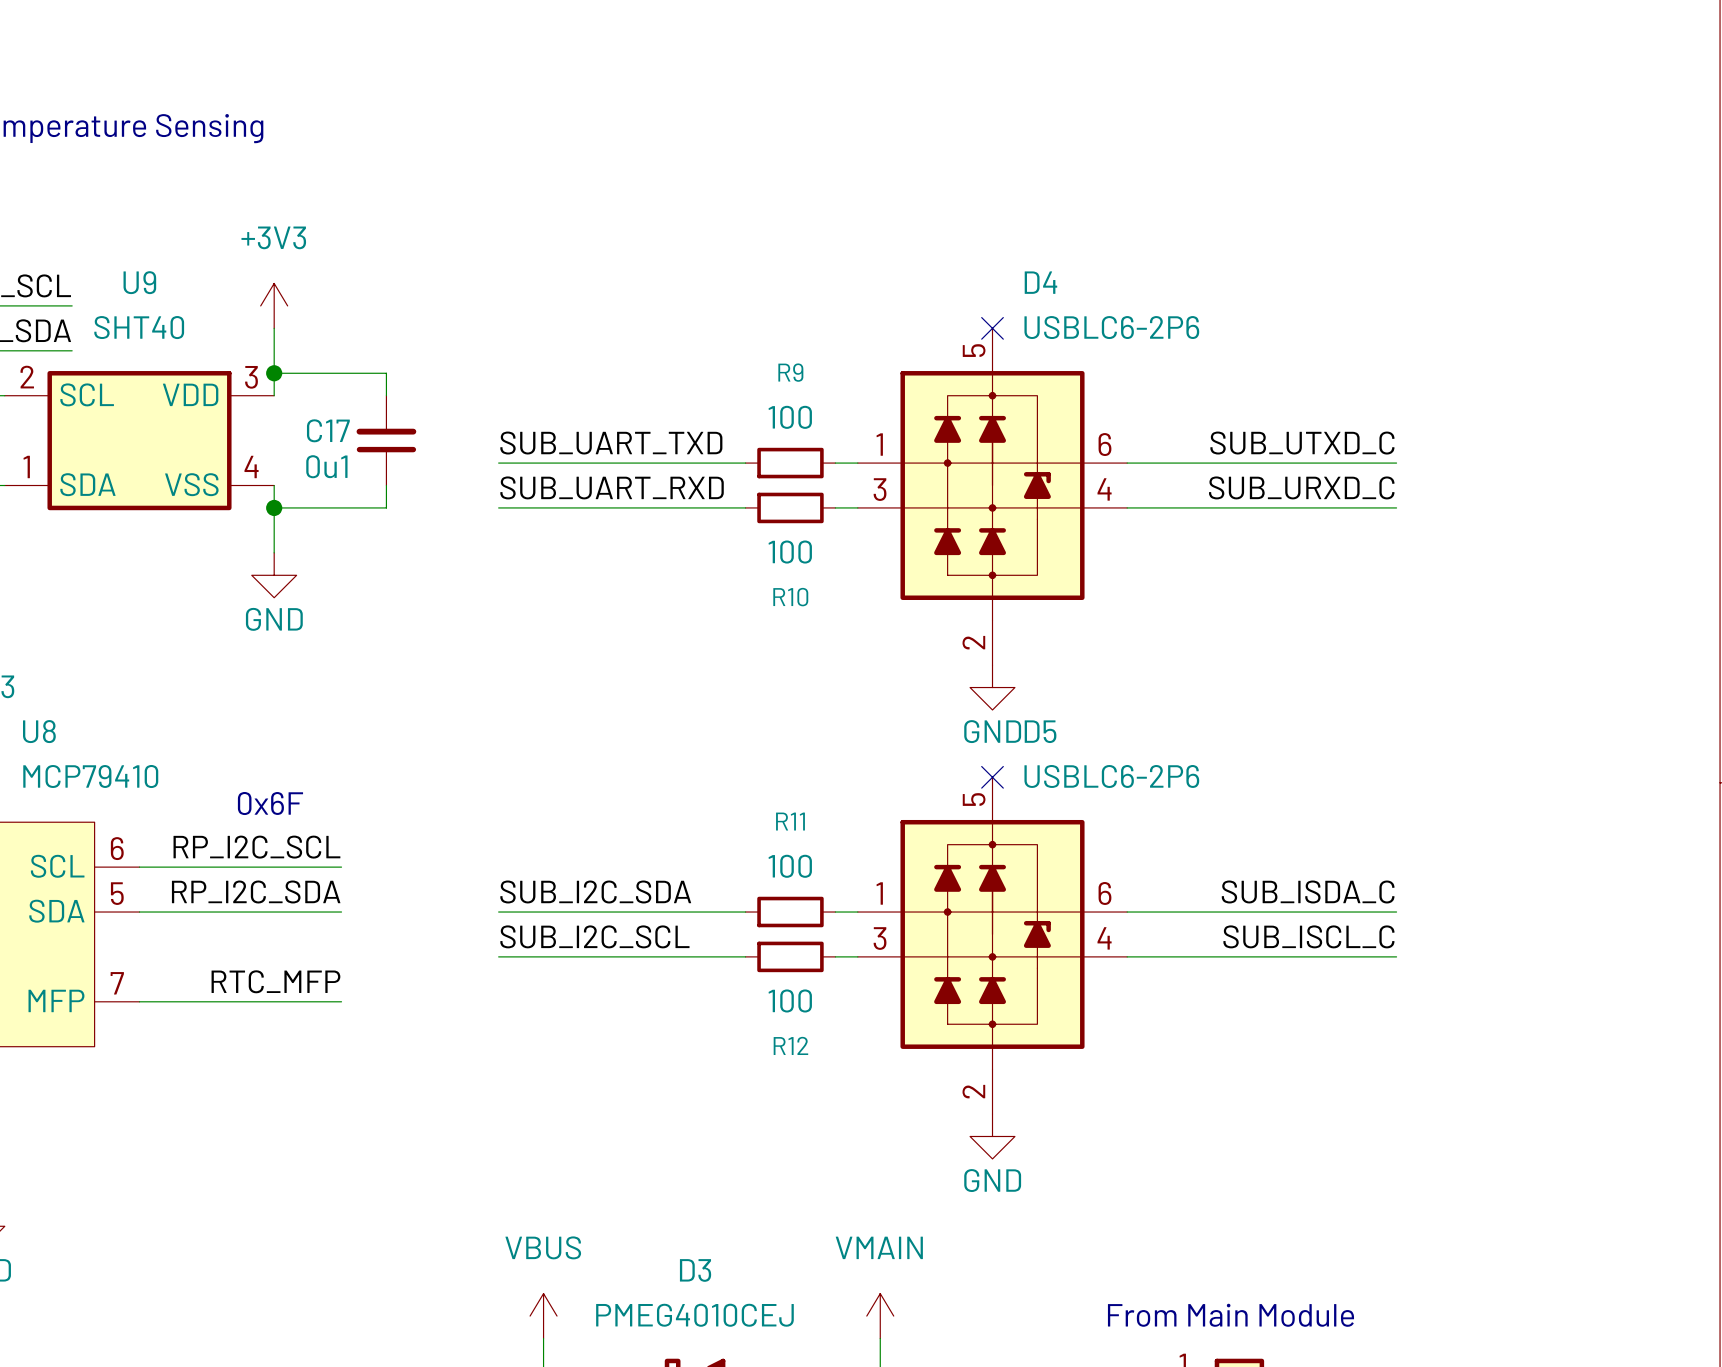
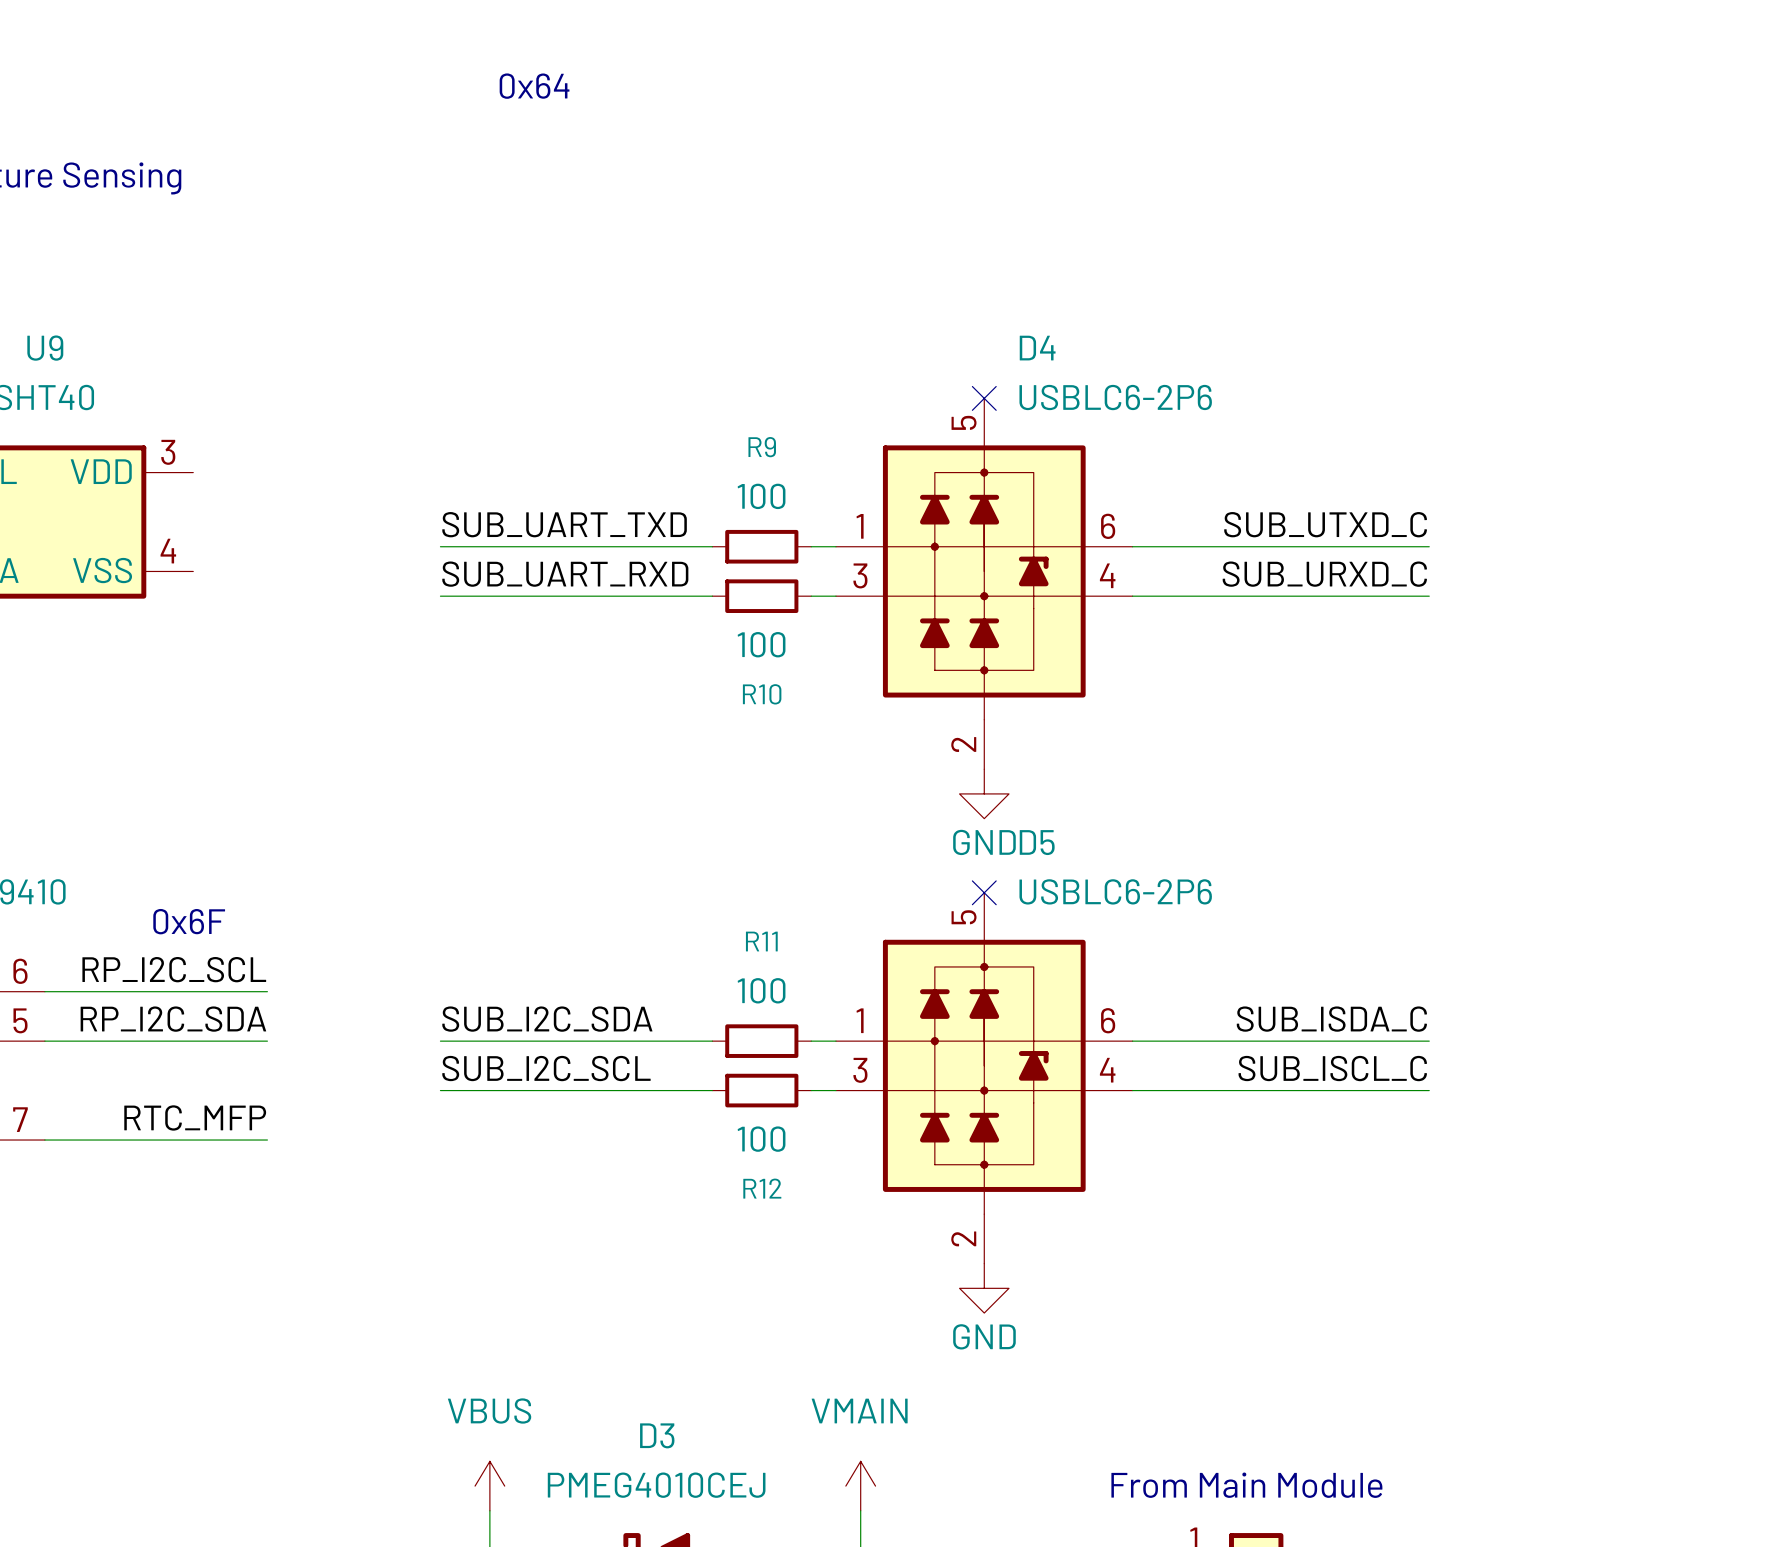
text: none -> 0x64 (534, 86)
power symbol: +3V3 (274, 305) -> none
wire: (274, 328) (274, 395) -> none
wire: (274, 373) (386, 373) (386, 395) -> none
junction: (274, 373) -> none
C17: 0u1 (386, 440) -> none
wire: (274, 485) (274, 552) -> none
wire: (386, 485) (386, 507) (274, 507) -> none
junction: (274, 507) -> none
power symbol: GND (274, 575) -> none

